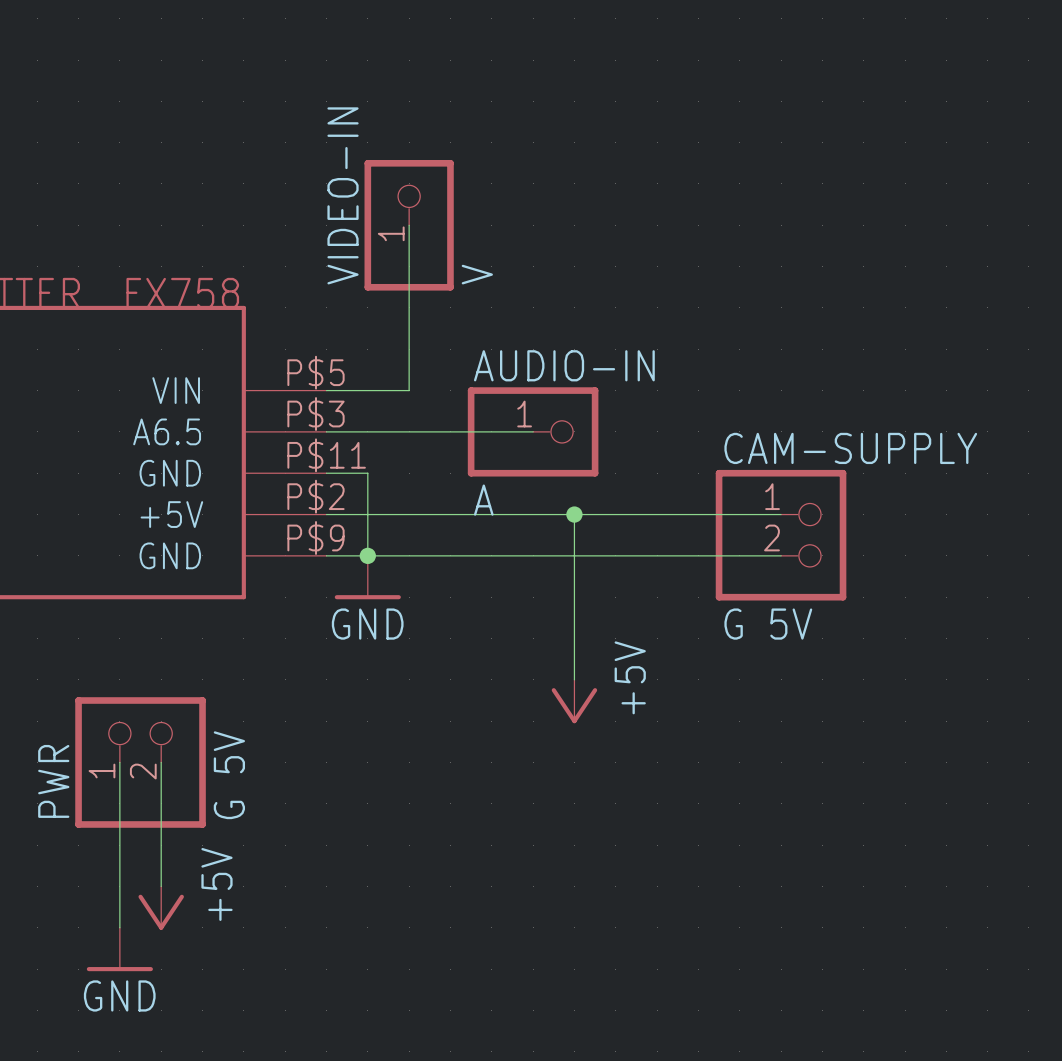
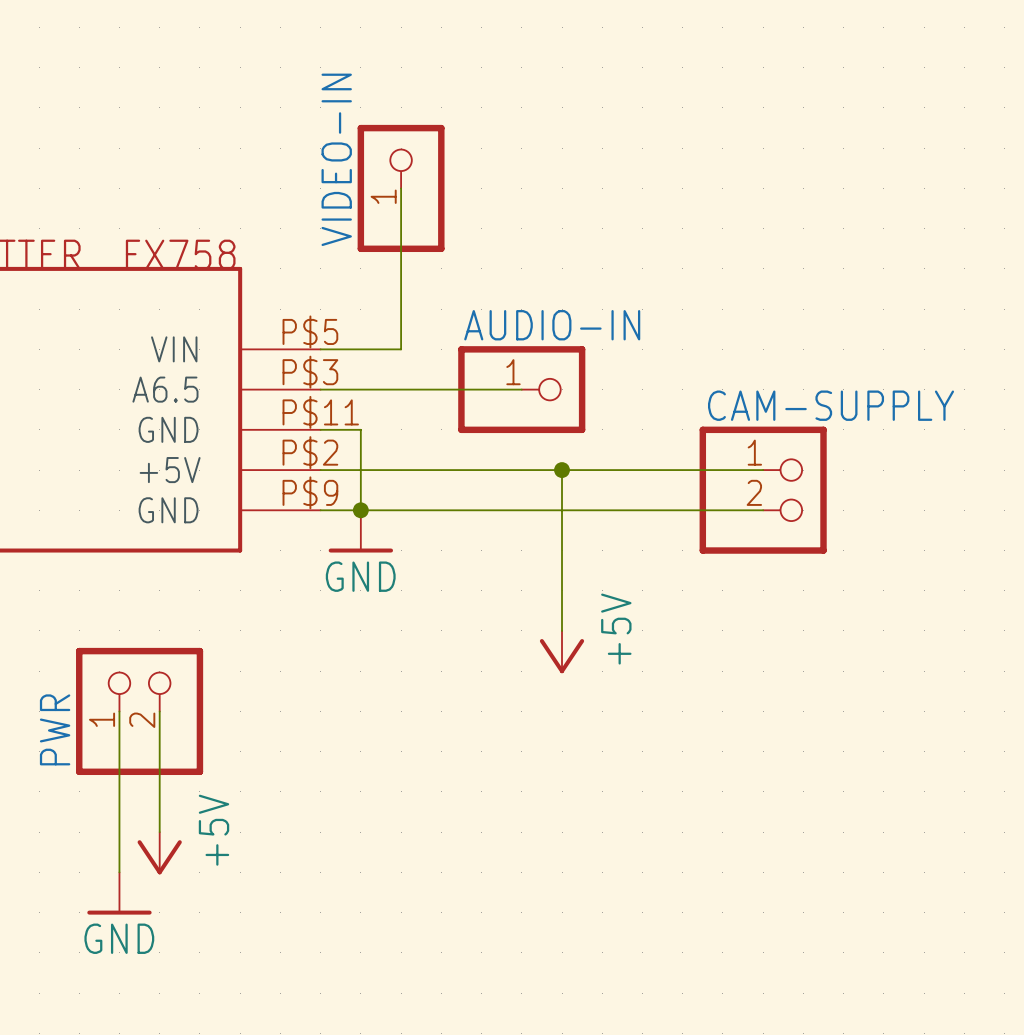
VIDEO-IN value: V (477, 274) -> none
AUDIO-IN value: A (483, 500) -> none
CAM-SUPPLY value: G 5V (768, 624) -> none
PWR value: G 5V (229, 775) -> none

